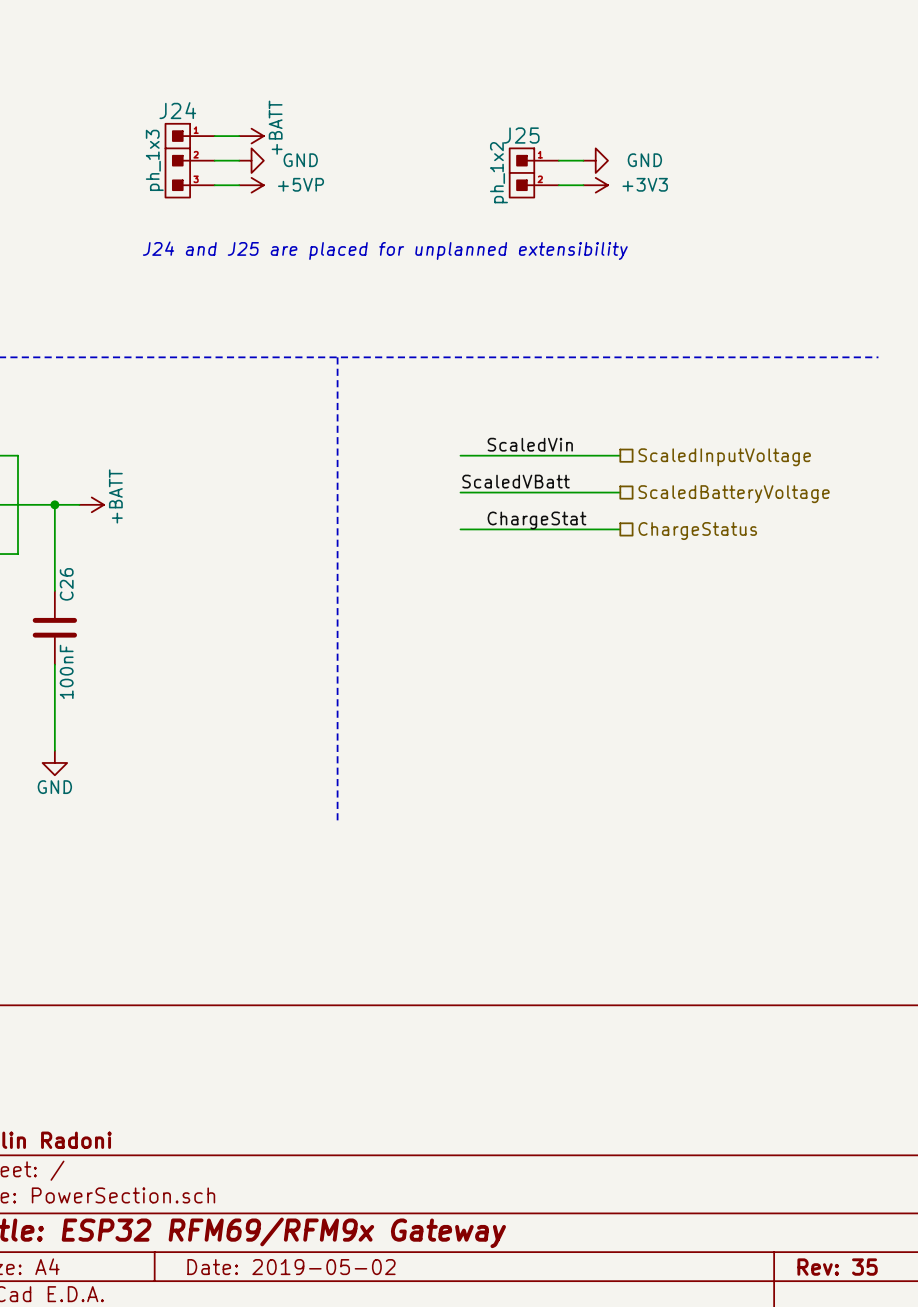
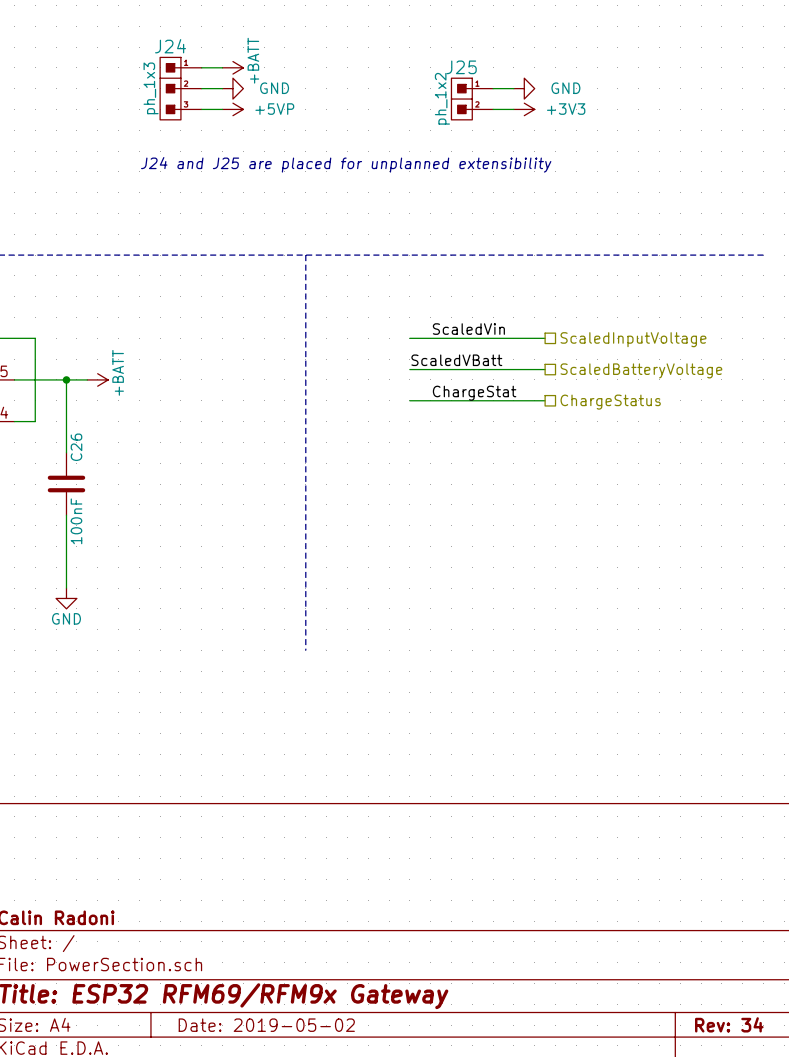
title block: Rev: 35 (837, 1267) -> Rev: 34 (729, 1024)

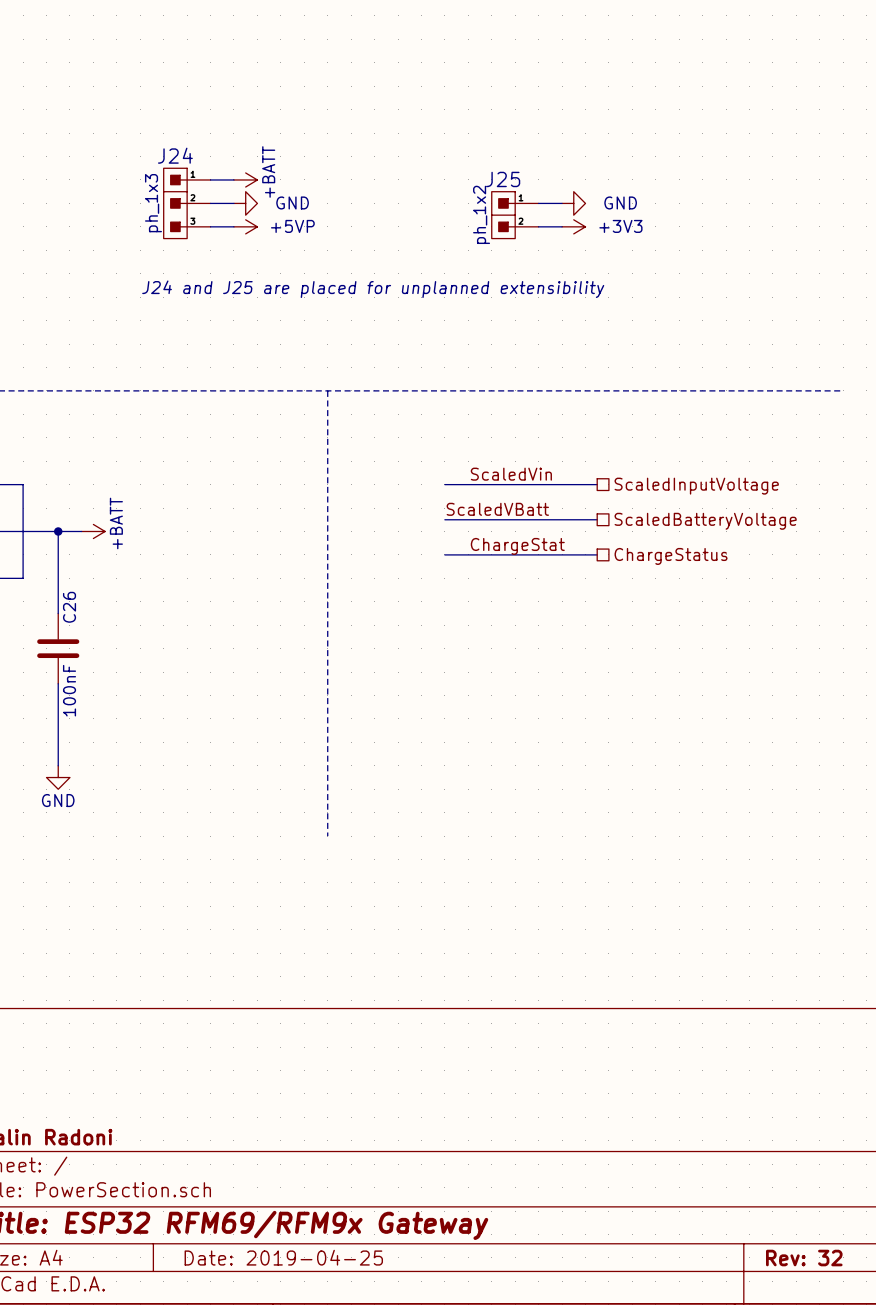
title block: Rev: 34 (729, 1024) -> Rev: 32 (804, 1258)
title block: Date: 2019-05-02 (266, 1025) -> Date: 2019-04-25 (283, 1257)

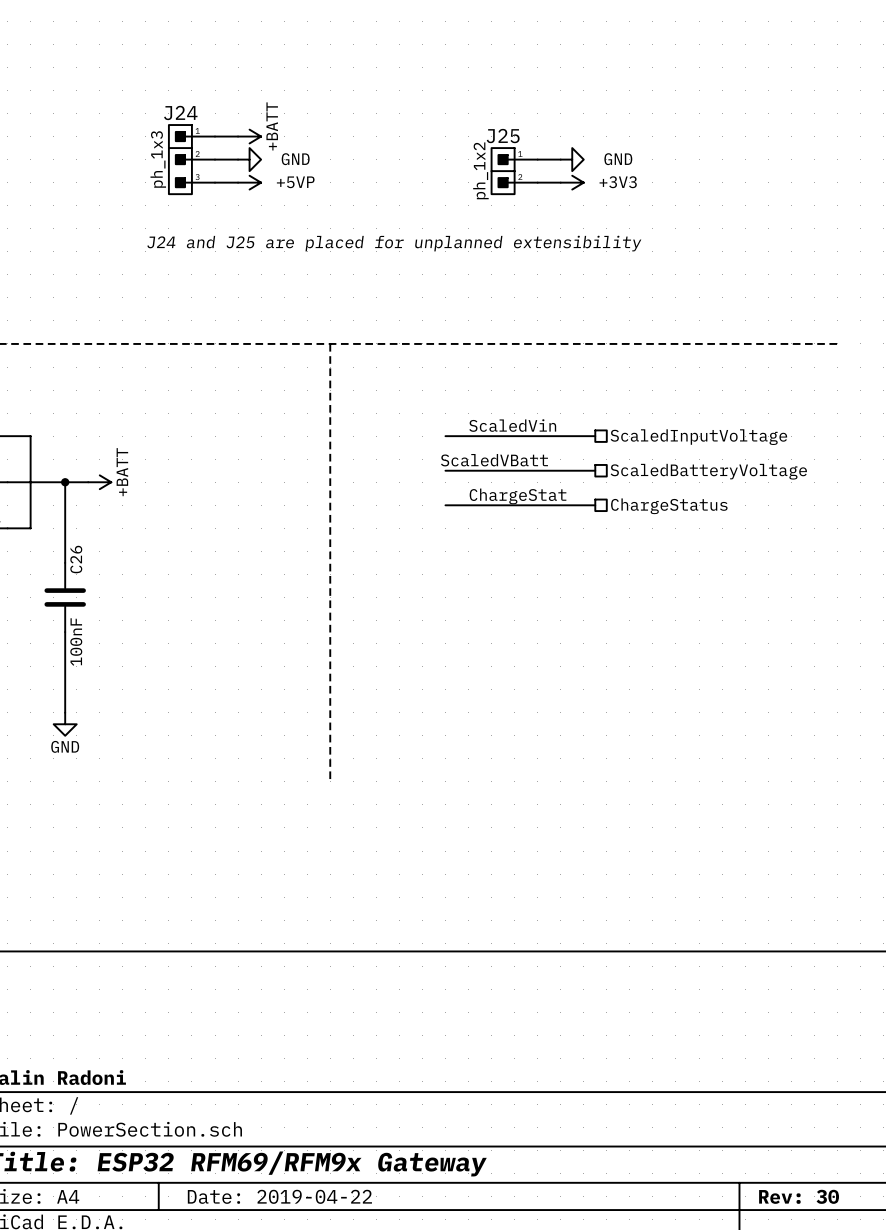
title block: Date: 2019-04-25 (283, 1257) -> Date: 2019-04-22 (279, 1196)
title block: Rev: 32 (804, 1258) -> Rev: 30 (799, 1196)

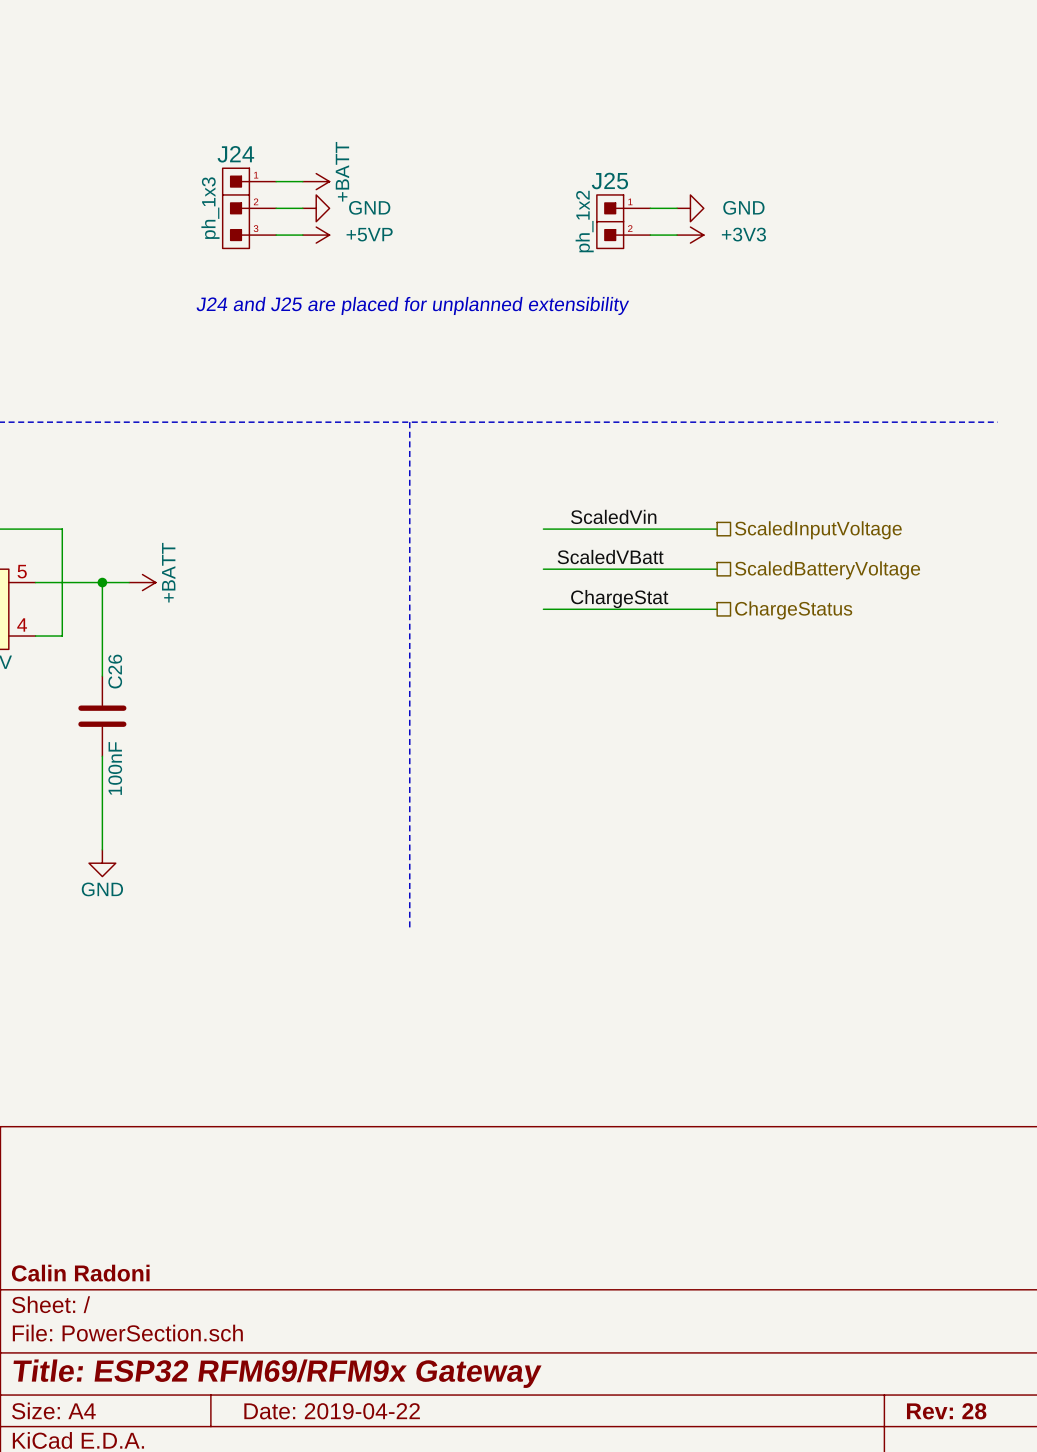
title block: Rev: 30 (799, 1196) -> Rev: 28 (946, 1411)

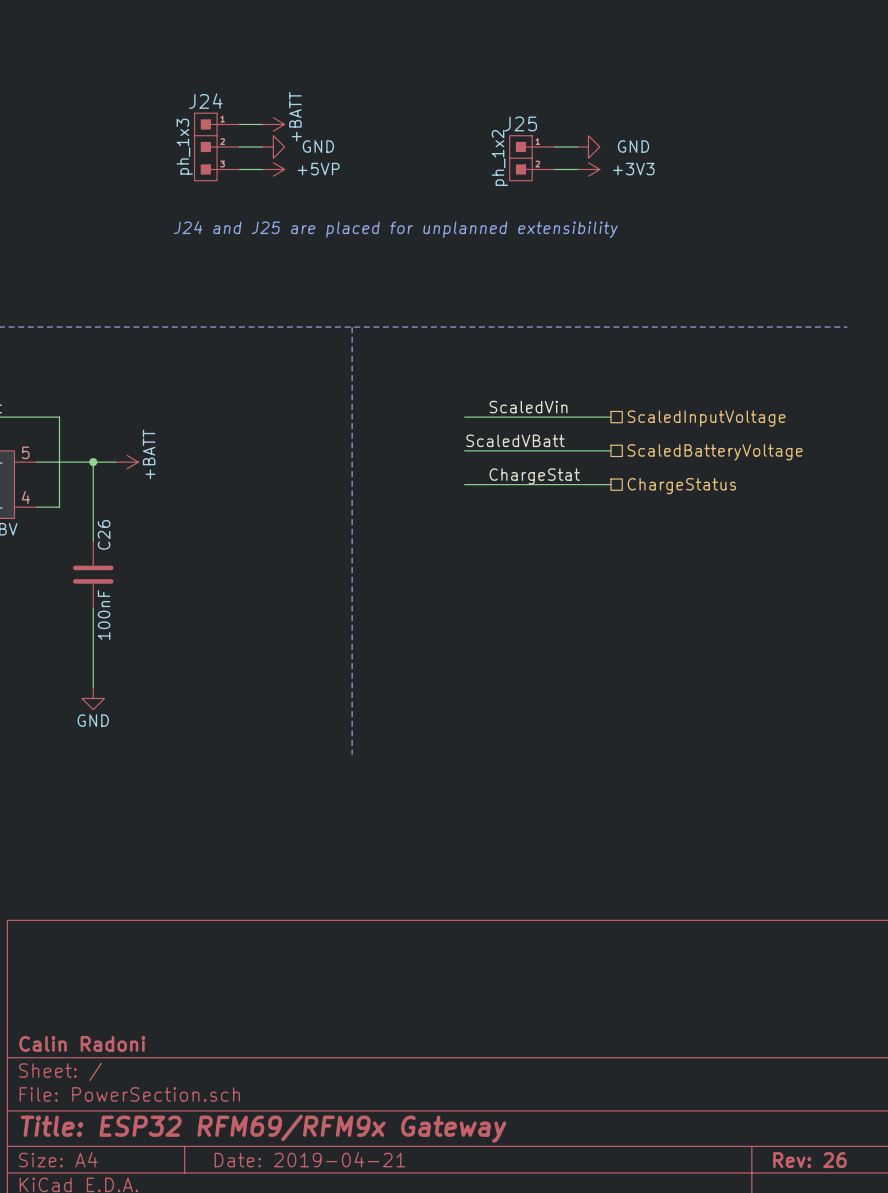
title block: Date: 2019-04-22 (332, 1411) -> Date: 2019-04-21 (309, 1159)
title block: Rev: 28 (946, 1411) -> Rev: 26 (809, 1160)

